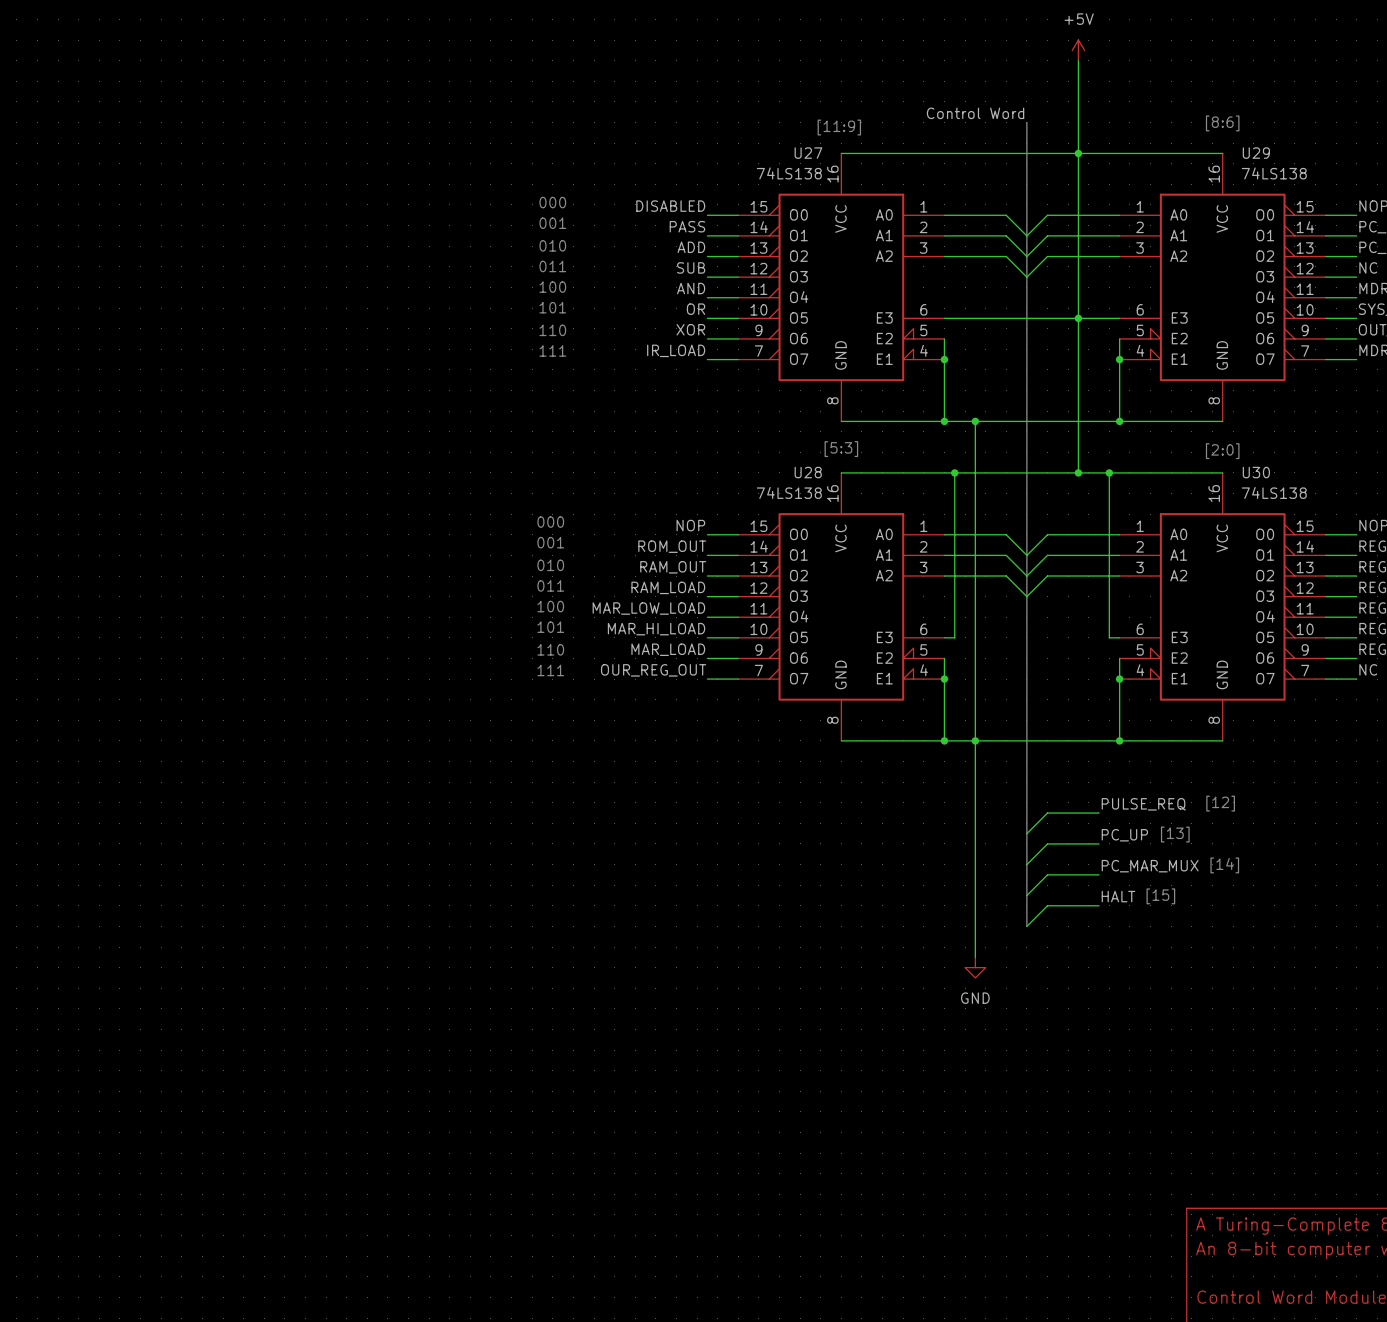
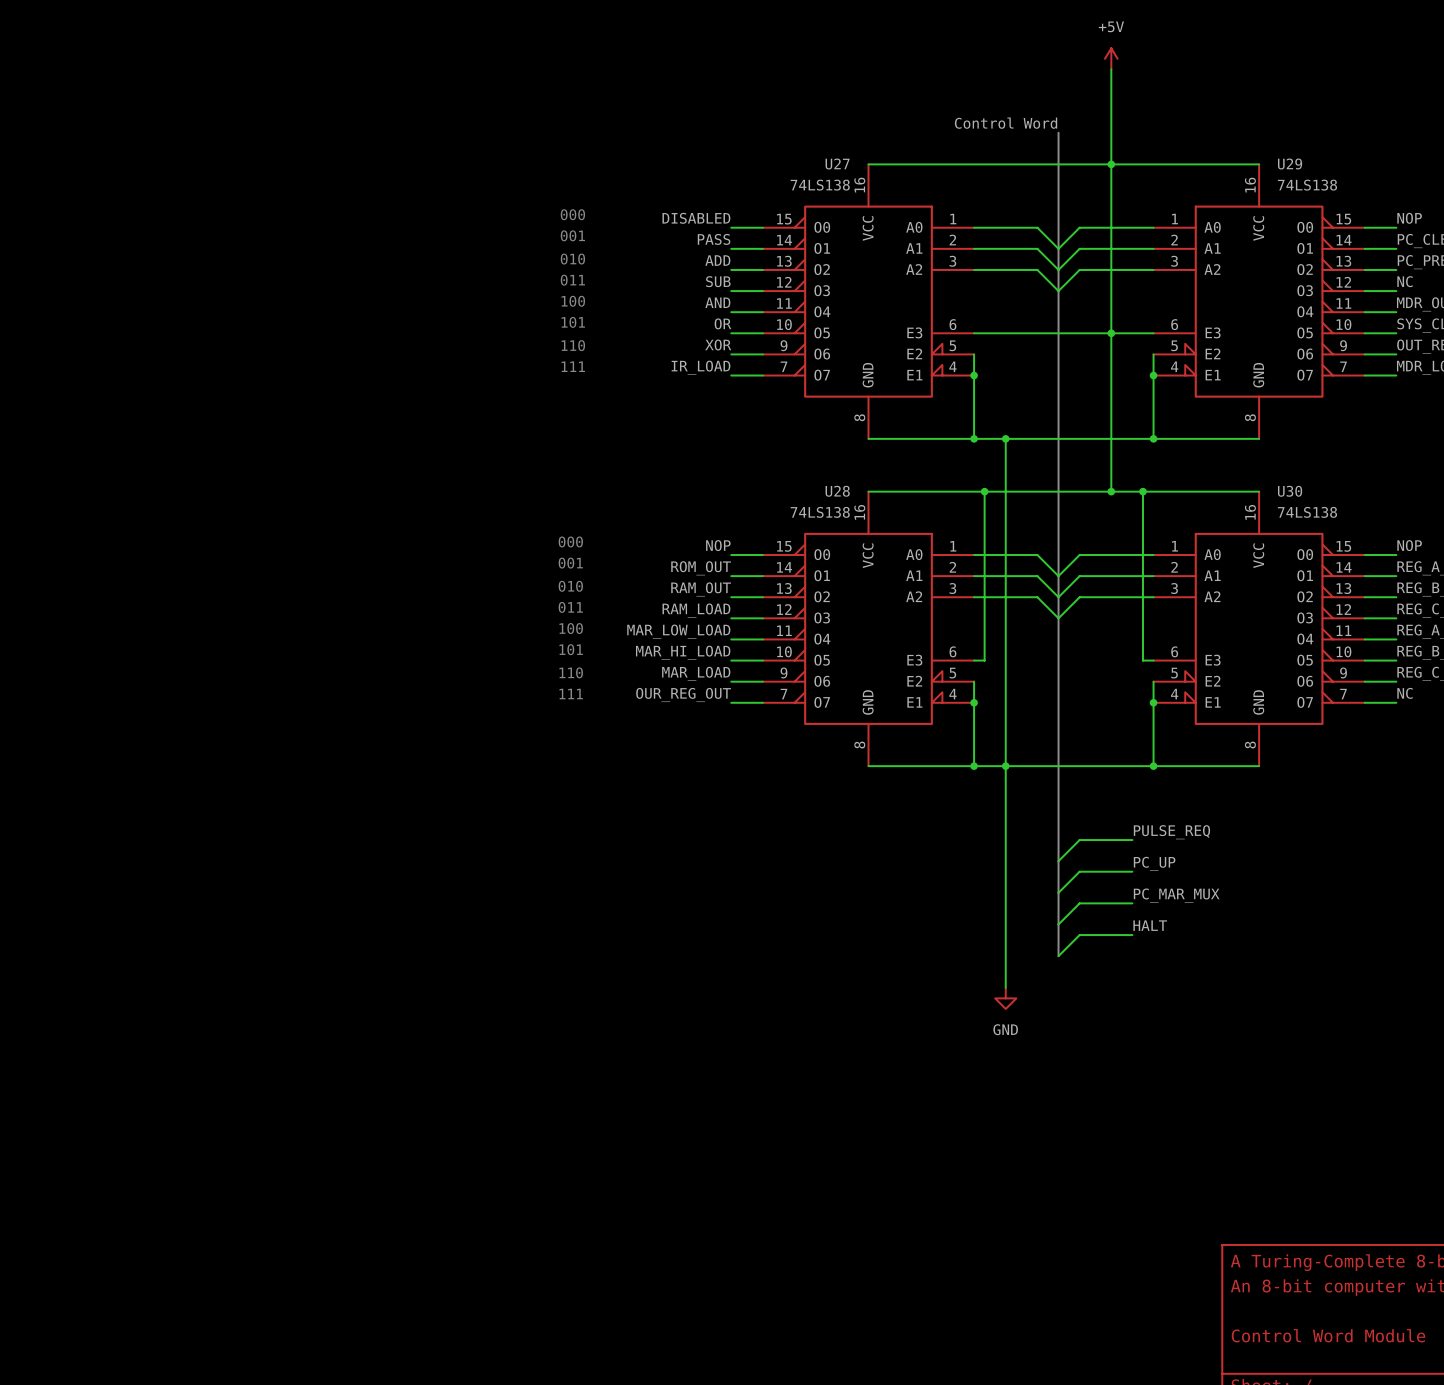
text: [8:6] (1222, 123) -> none
text: [11:9] (839, 127) -> none
text: [5:3] (841, 449) -> none
text: [2:0] (1222, 451) -> none
text: [12] (1220, 803) -> none
text: [13] (1175, 834) -> none
text: [14] (1224, 865) -> none
text: [15] (1160, 896) -> none

